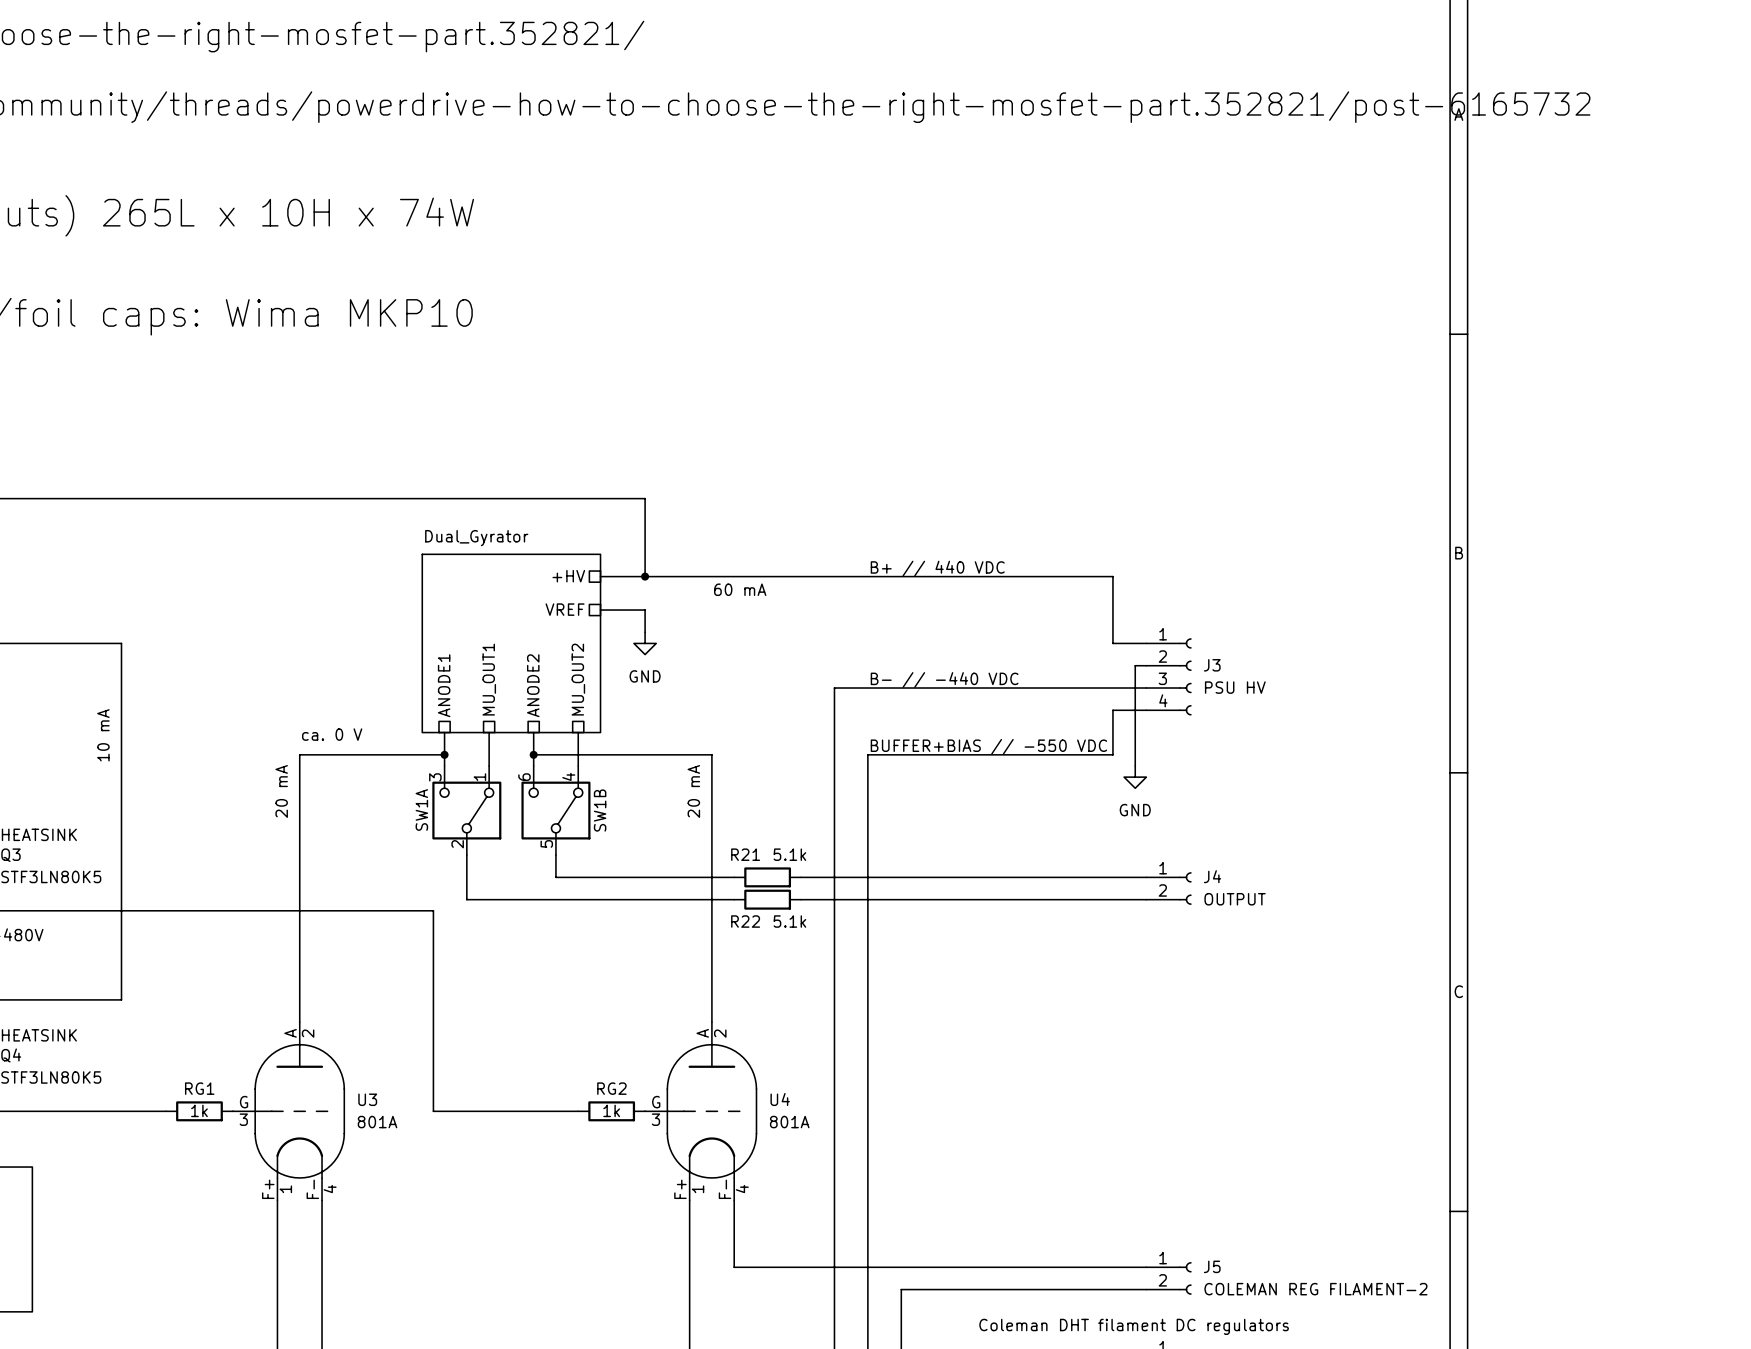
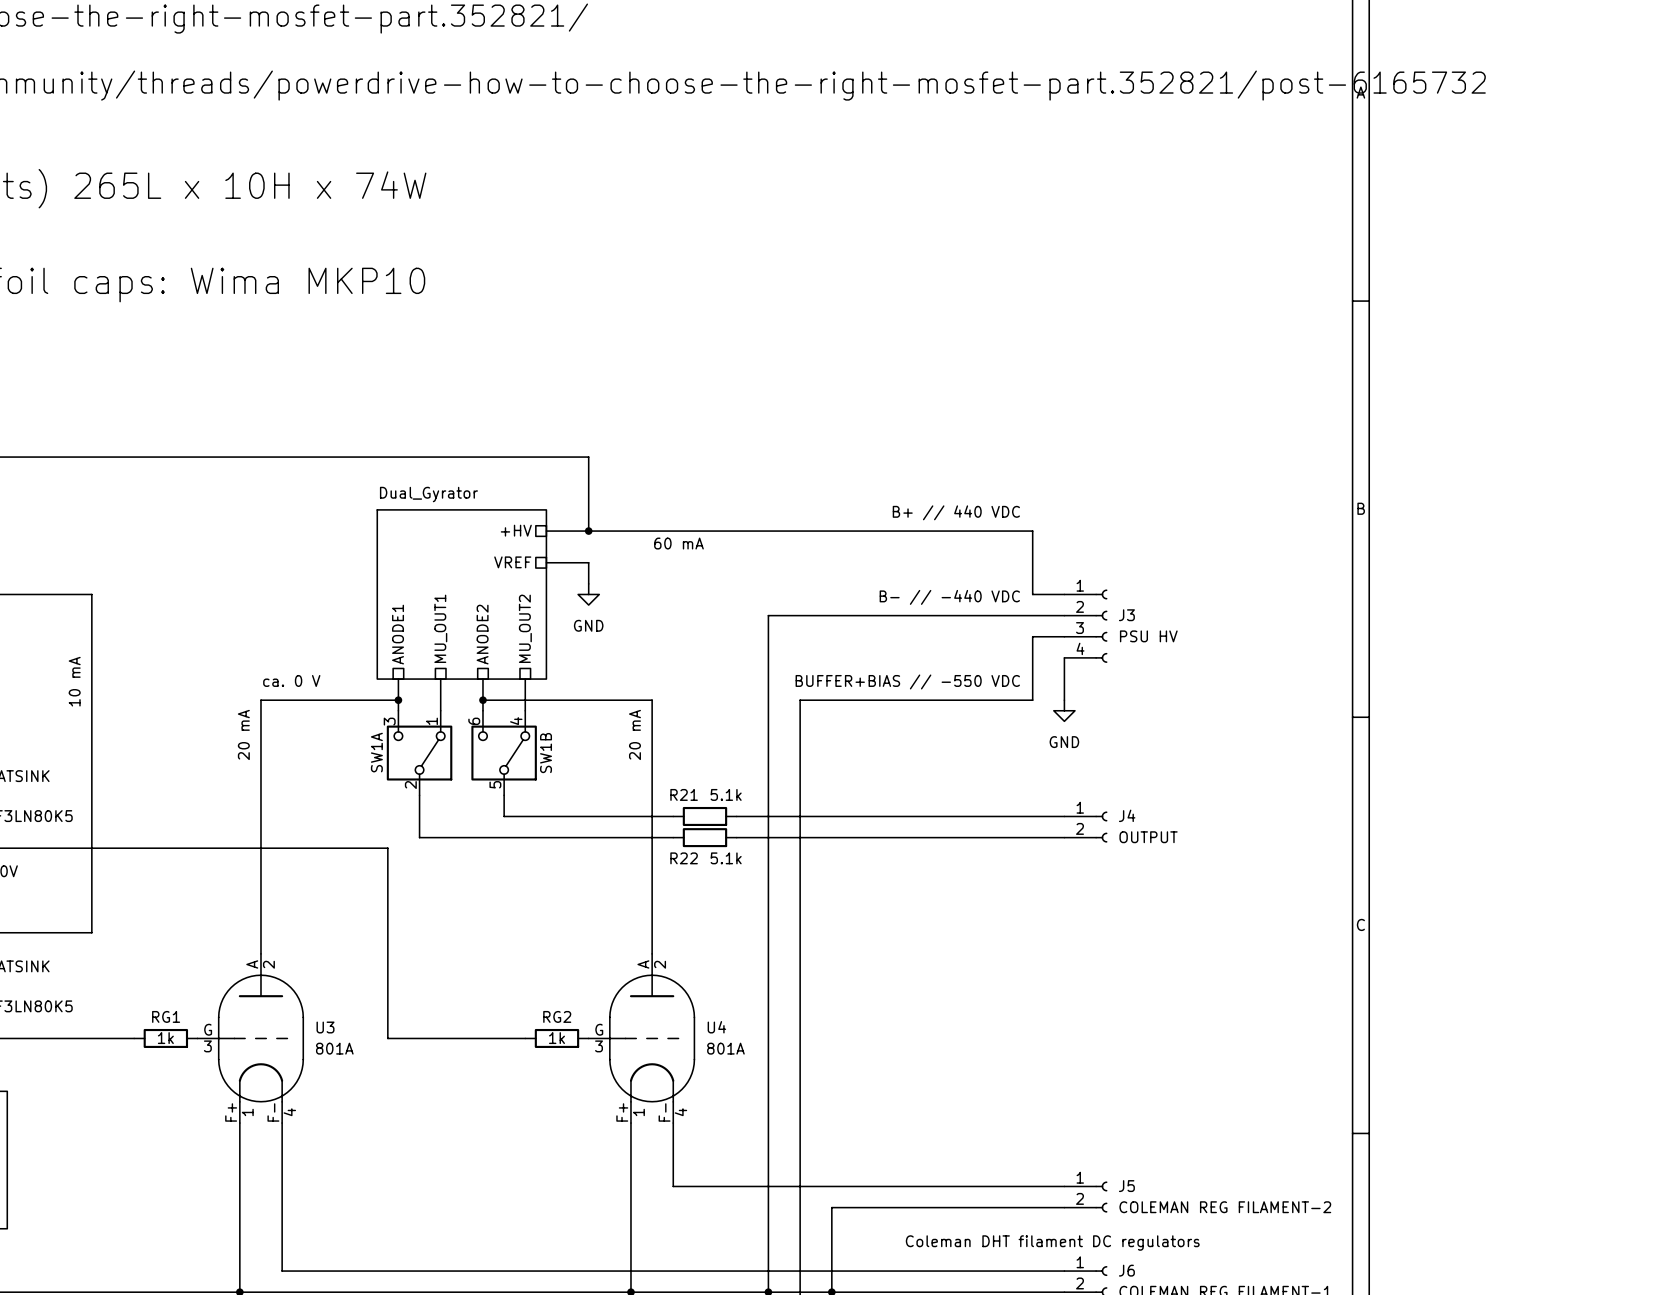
text: none -> B+ // 440 VDC (956, 512)
text: B+ // 440 VDC (937, 568) -> none
text: none -> B- // -440 VDC (949, 597)
wire: (1135, 665) (1135, 765) -> none
text: B- // -440 VDC (944, 679) -> none
wire: (834, 688) (1112, 688) -> (768, 636) (768, 615) (1053, 615)
wire: (1112, 710) (1146, 710) -> (1032, 657) (1032, 636)
wire: none -> (1064, 657) (1064, 700)
text: none -> BUFFER+BIAS // -550 VDC (907, 681)
text: BUFFER+BIAS // -550 VDC (988, 746) -> none
power symbol position: GND (1135, 777) -> GND (1064, 710)

